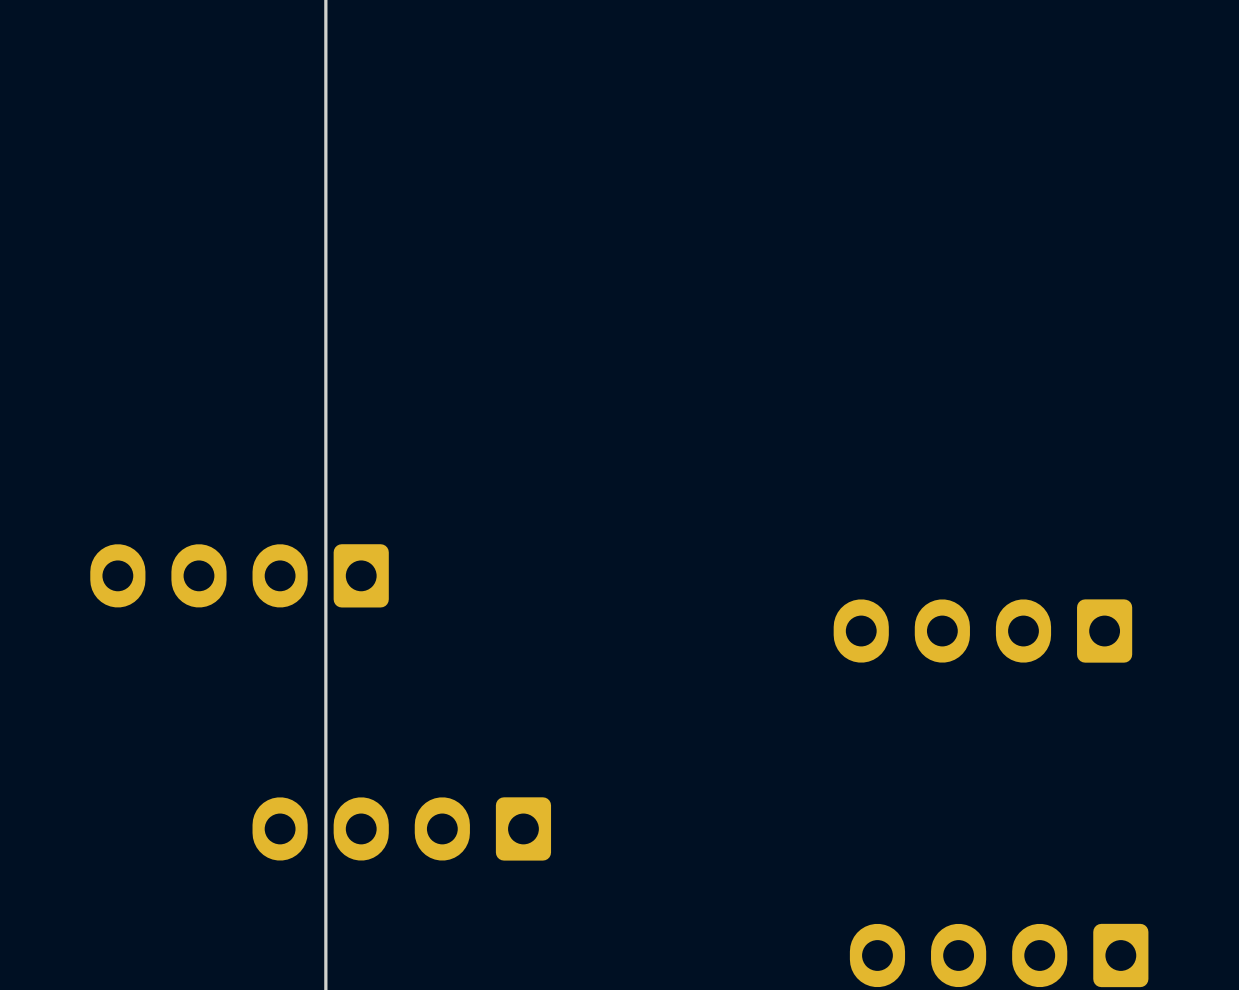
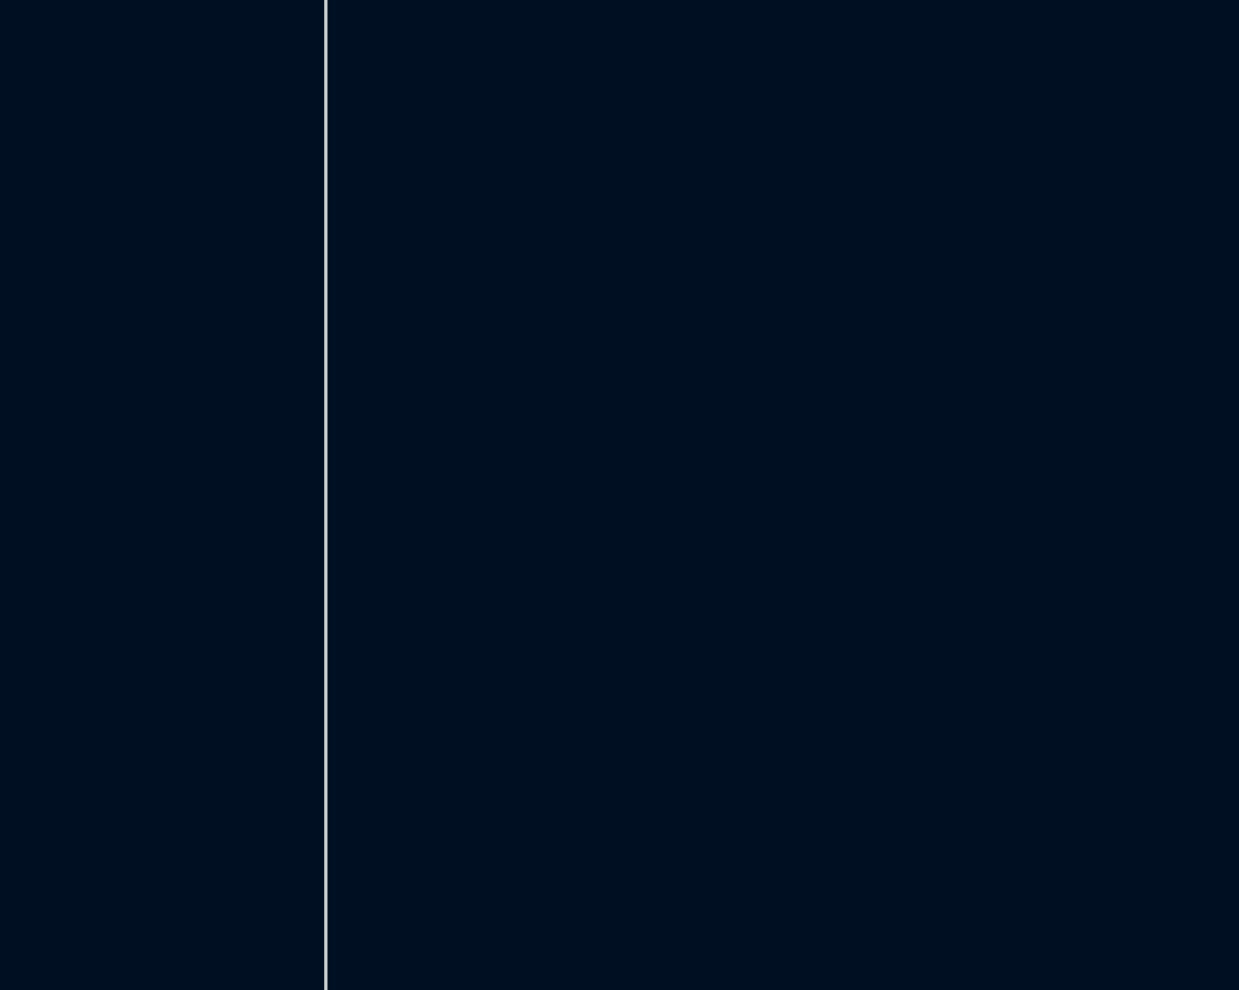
part: (239, 575) -> none
part: (982, 631) -> none
part: (401, 828) -> none
part: (999, 955) -> none

